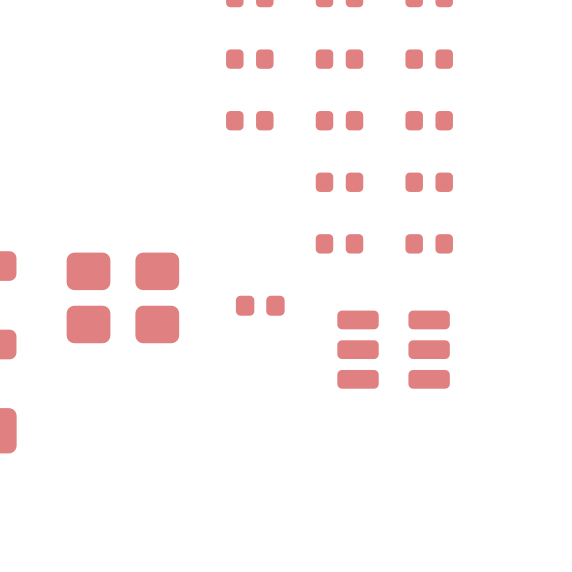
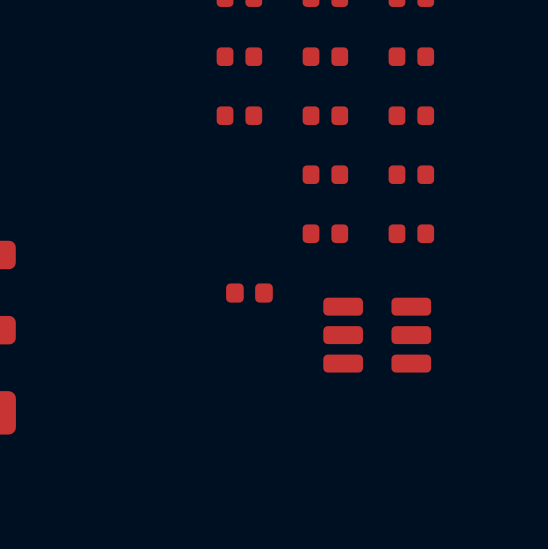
part: (122, 297) -> none

